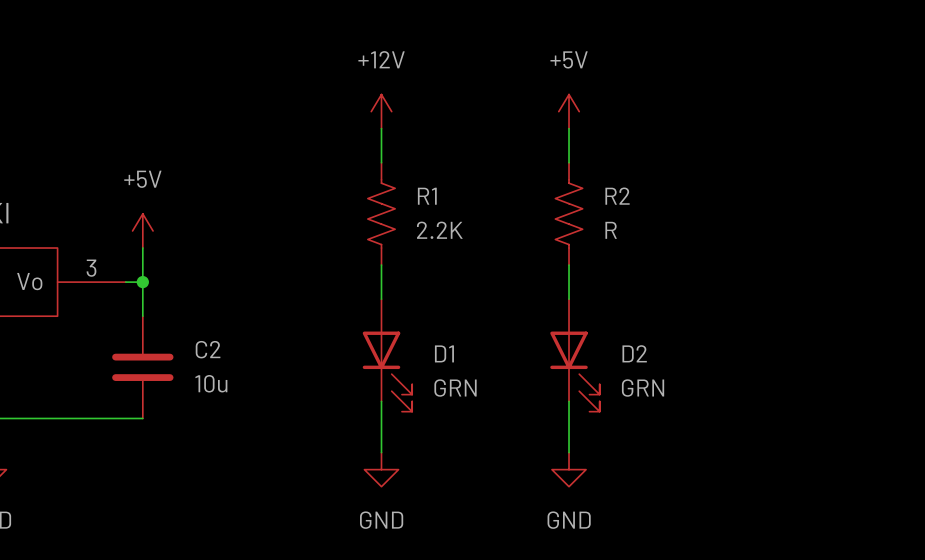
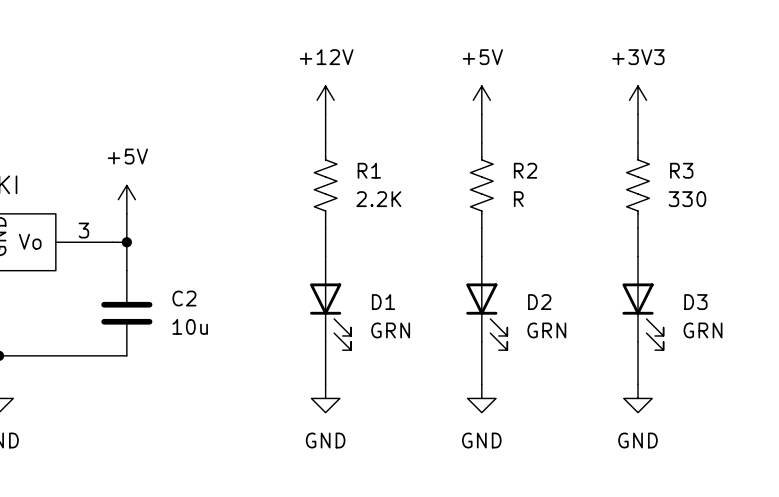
power symbol: none -> +3V3 (638, 100)
wire: none -> (638, 114) (638, 142)
R3: none -> 330 (638, 185)
wire: none -> (638, 228) (638, 256)
D3: none -> GRN (642, 303)
wire: none -> (638, 341) (638, 384)
power symbol: none -> GND (638, 398)

